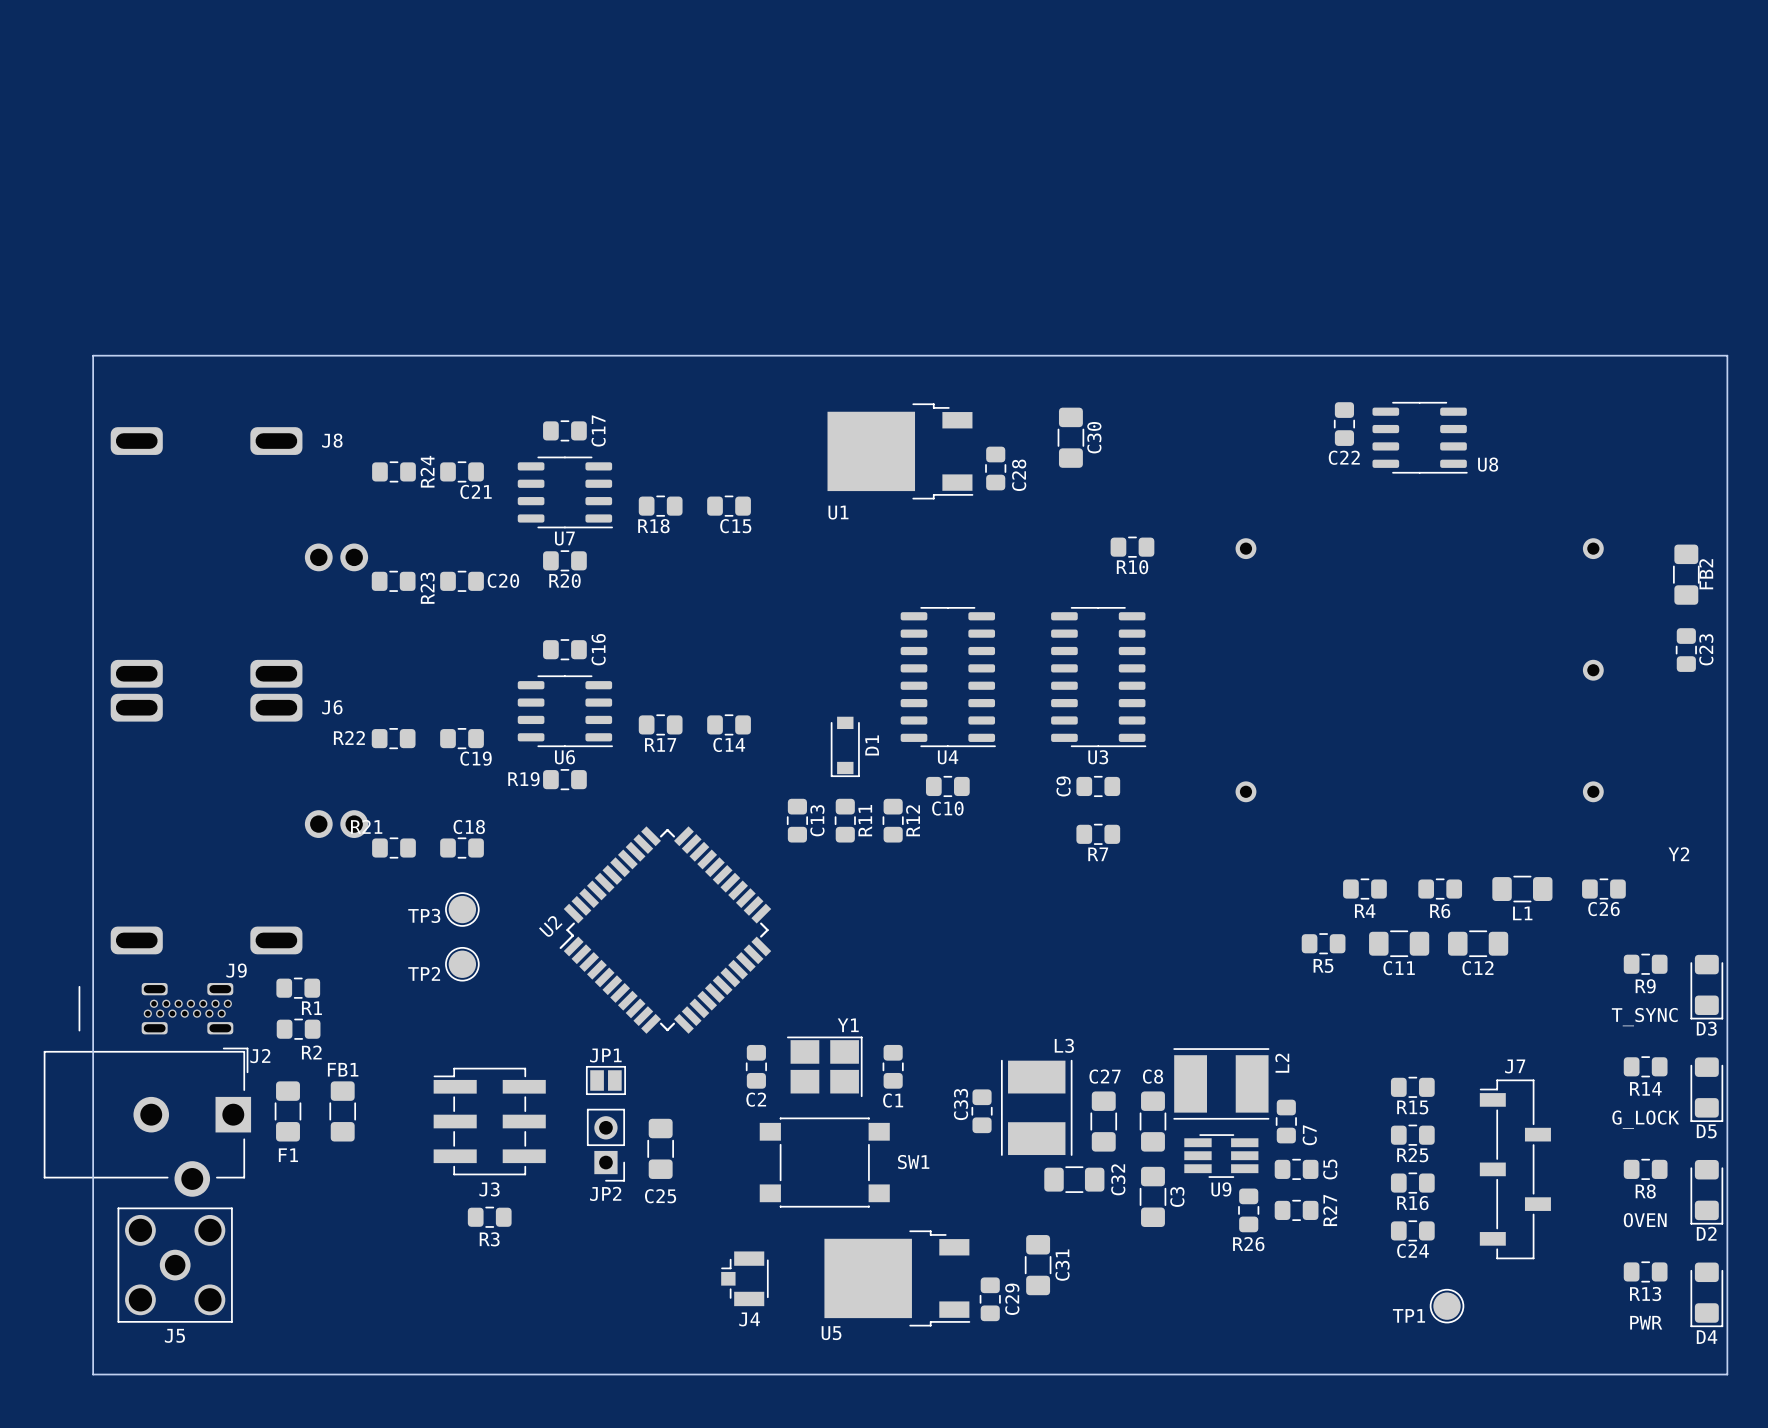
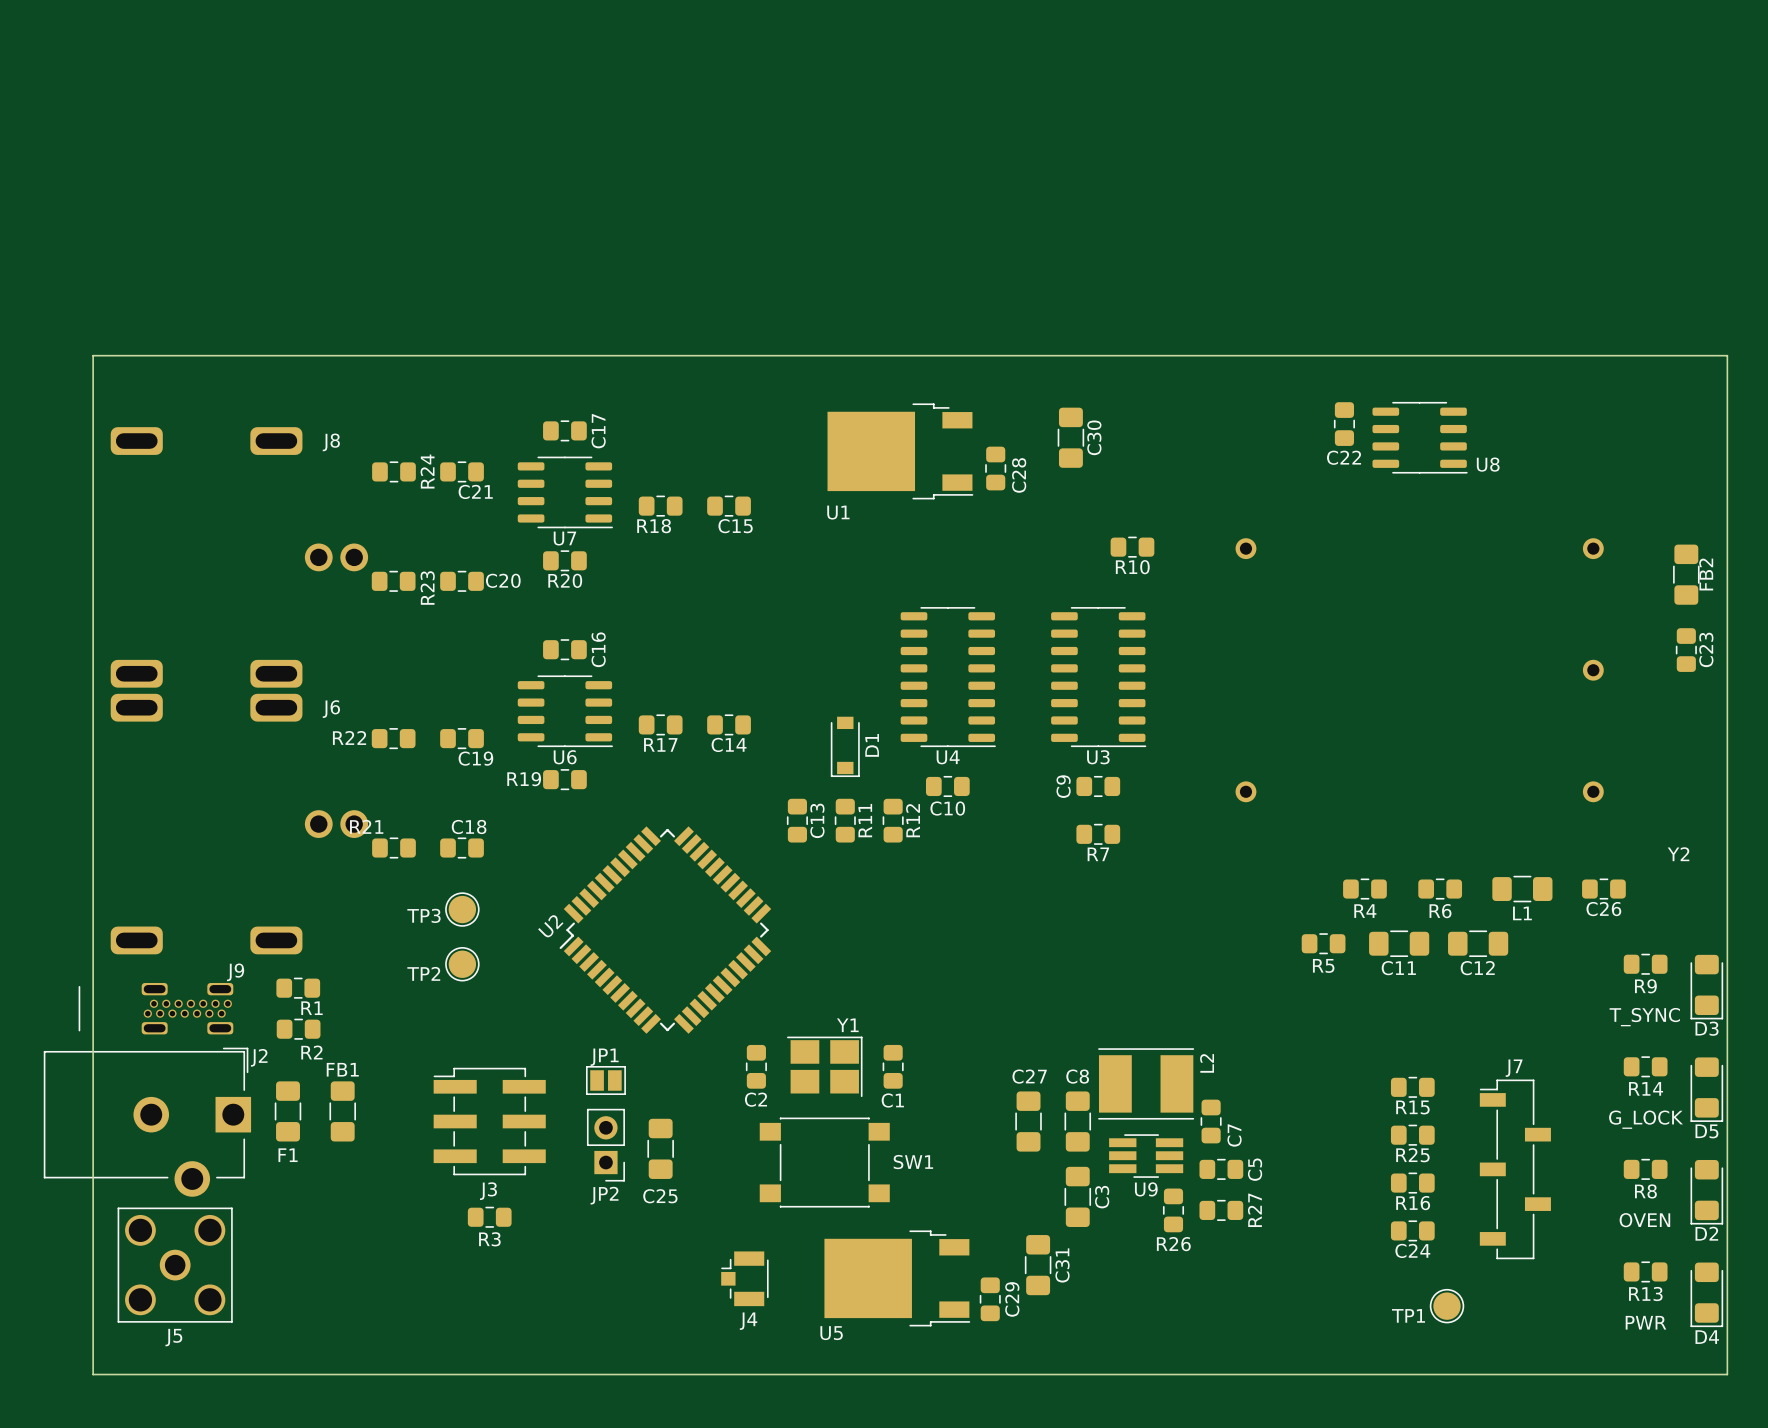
L2 position: (1221, 1083) -> (1146, 1083)
L3: (1036, 1107) -> none
C33: (982, 1111) -> none
C27 position: (1103, 1121) -> (1028, 1121)
C8 position: (1152, 1121) -> (1077, 1121)
C7 position: (1286, 1121) -> (1211, 1121)
U9 position: (1221, 1156) -> (1146, 1156)
C5 position: (1296, 1169) -> (1221, 1169)
C32: (1074, 1179) -> none
C3 position: (1152, 1196) -> (1077, 1196)
R26 position: (1248, 1210) -> (1173, 1210)
R27 position: (1296, 1210) -> (1221, 1210)

